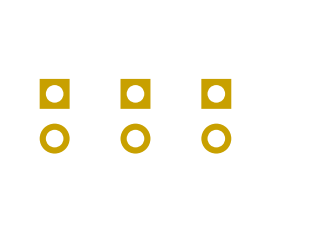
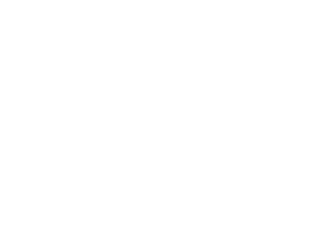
part: (54, 116) -> none
part: (135, 116) -> none
part: (216, 116) -> none

